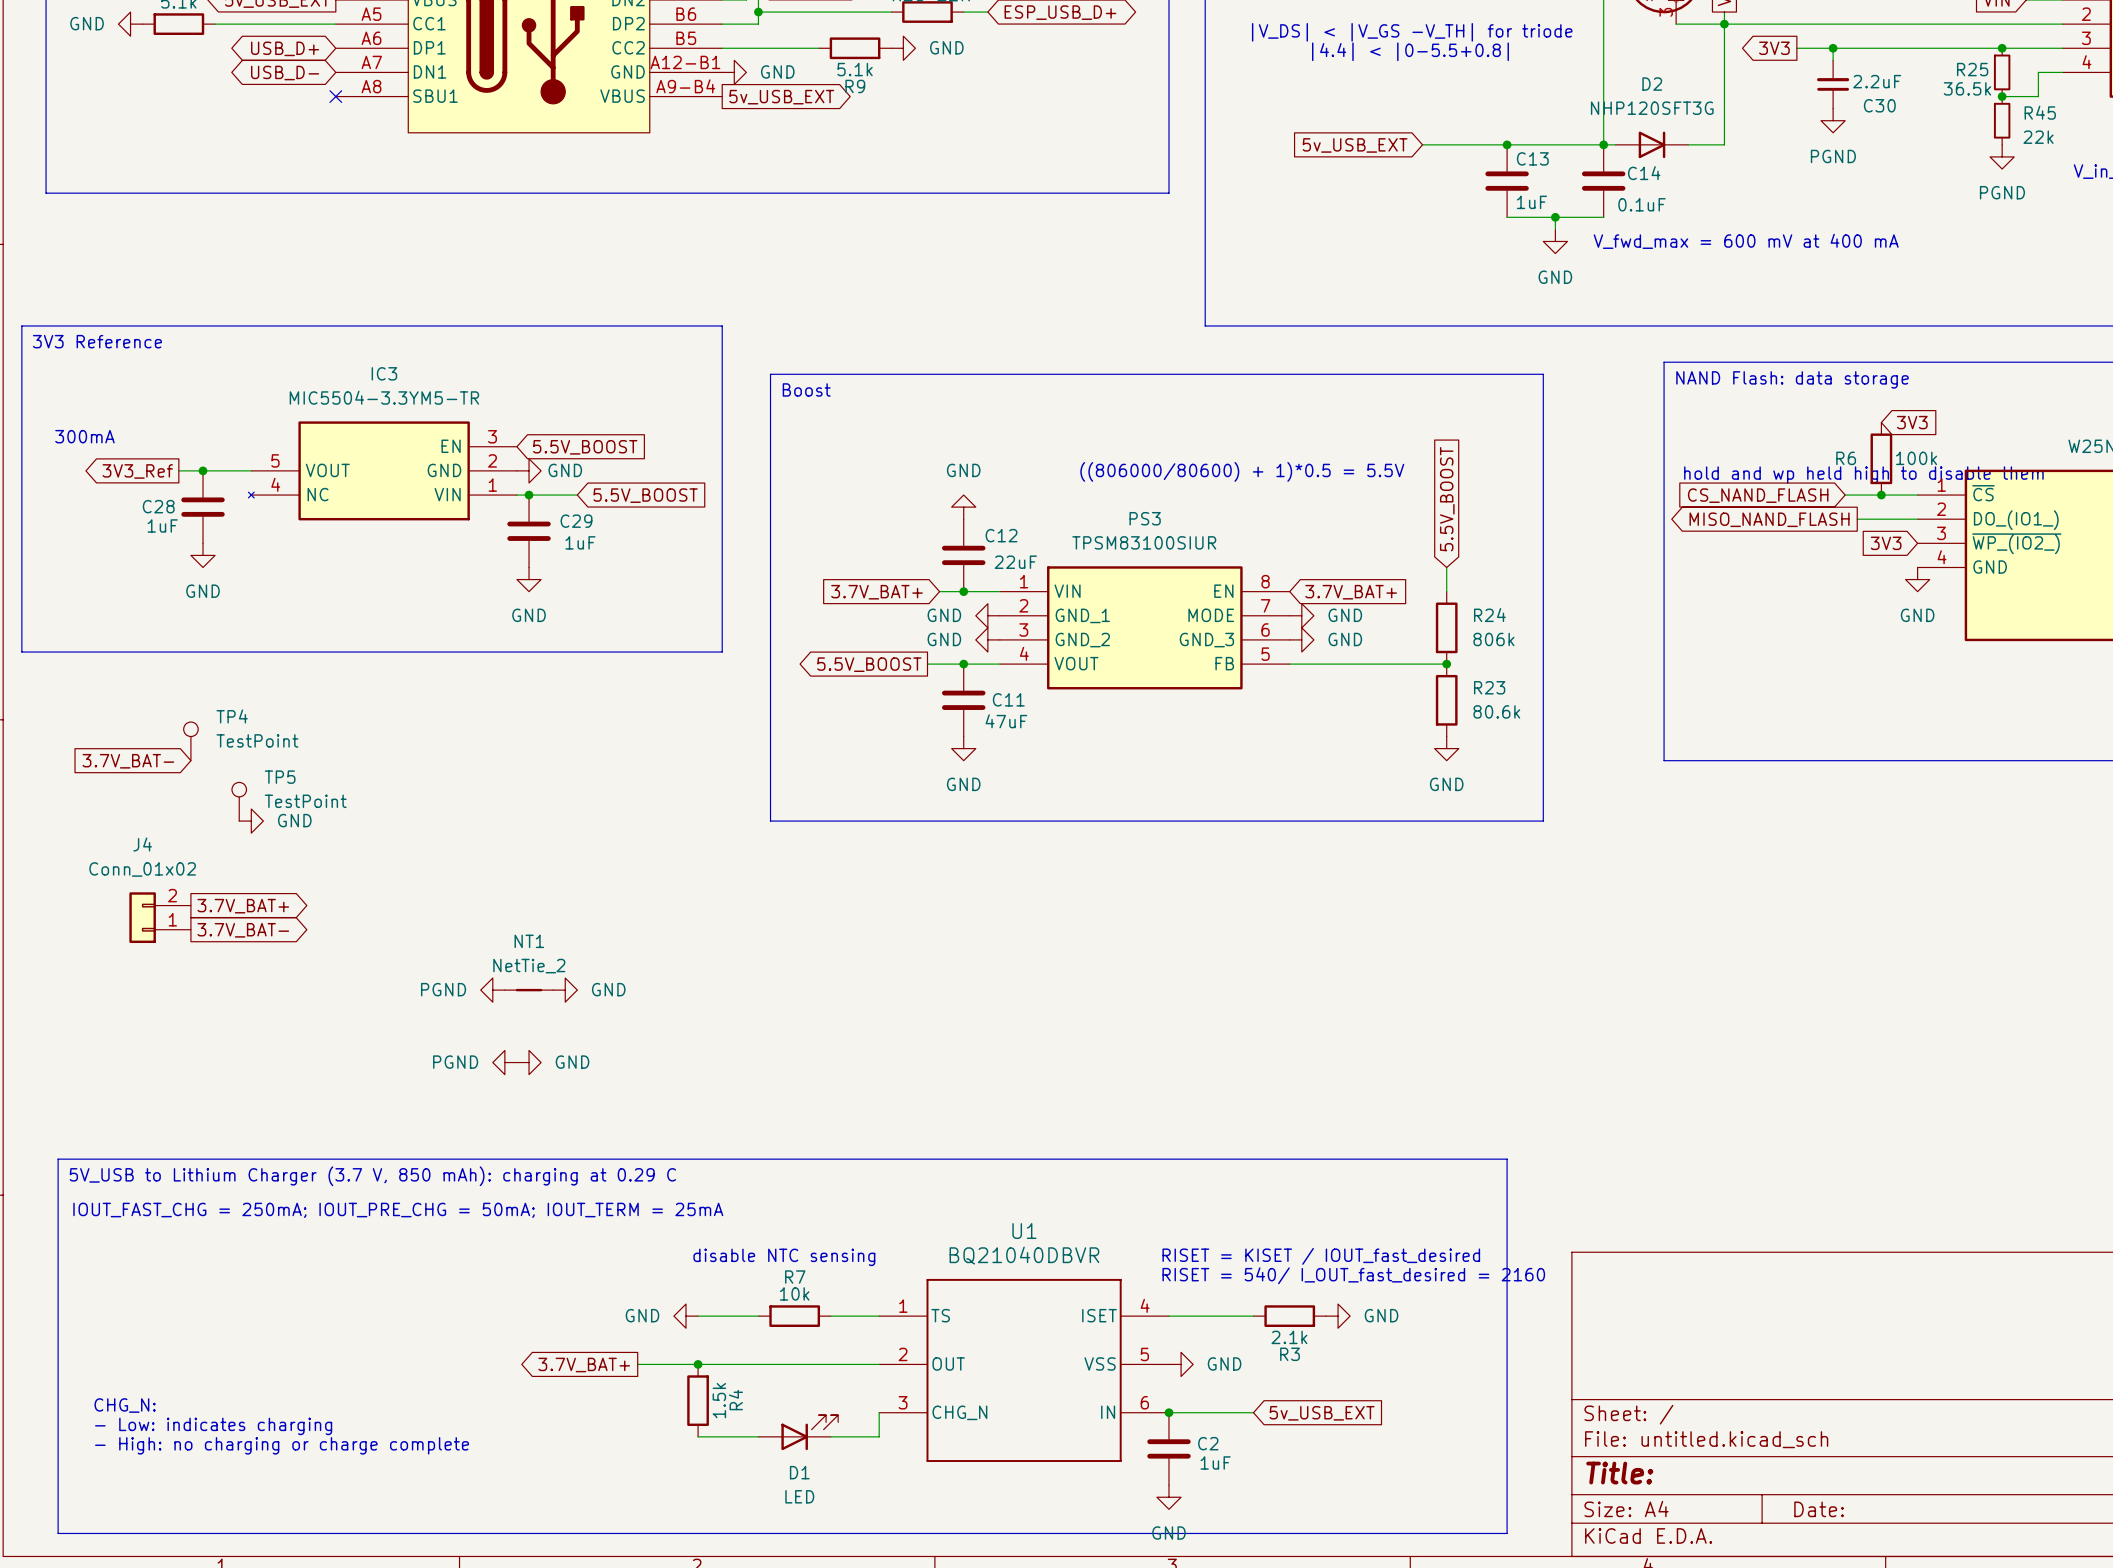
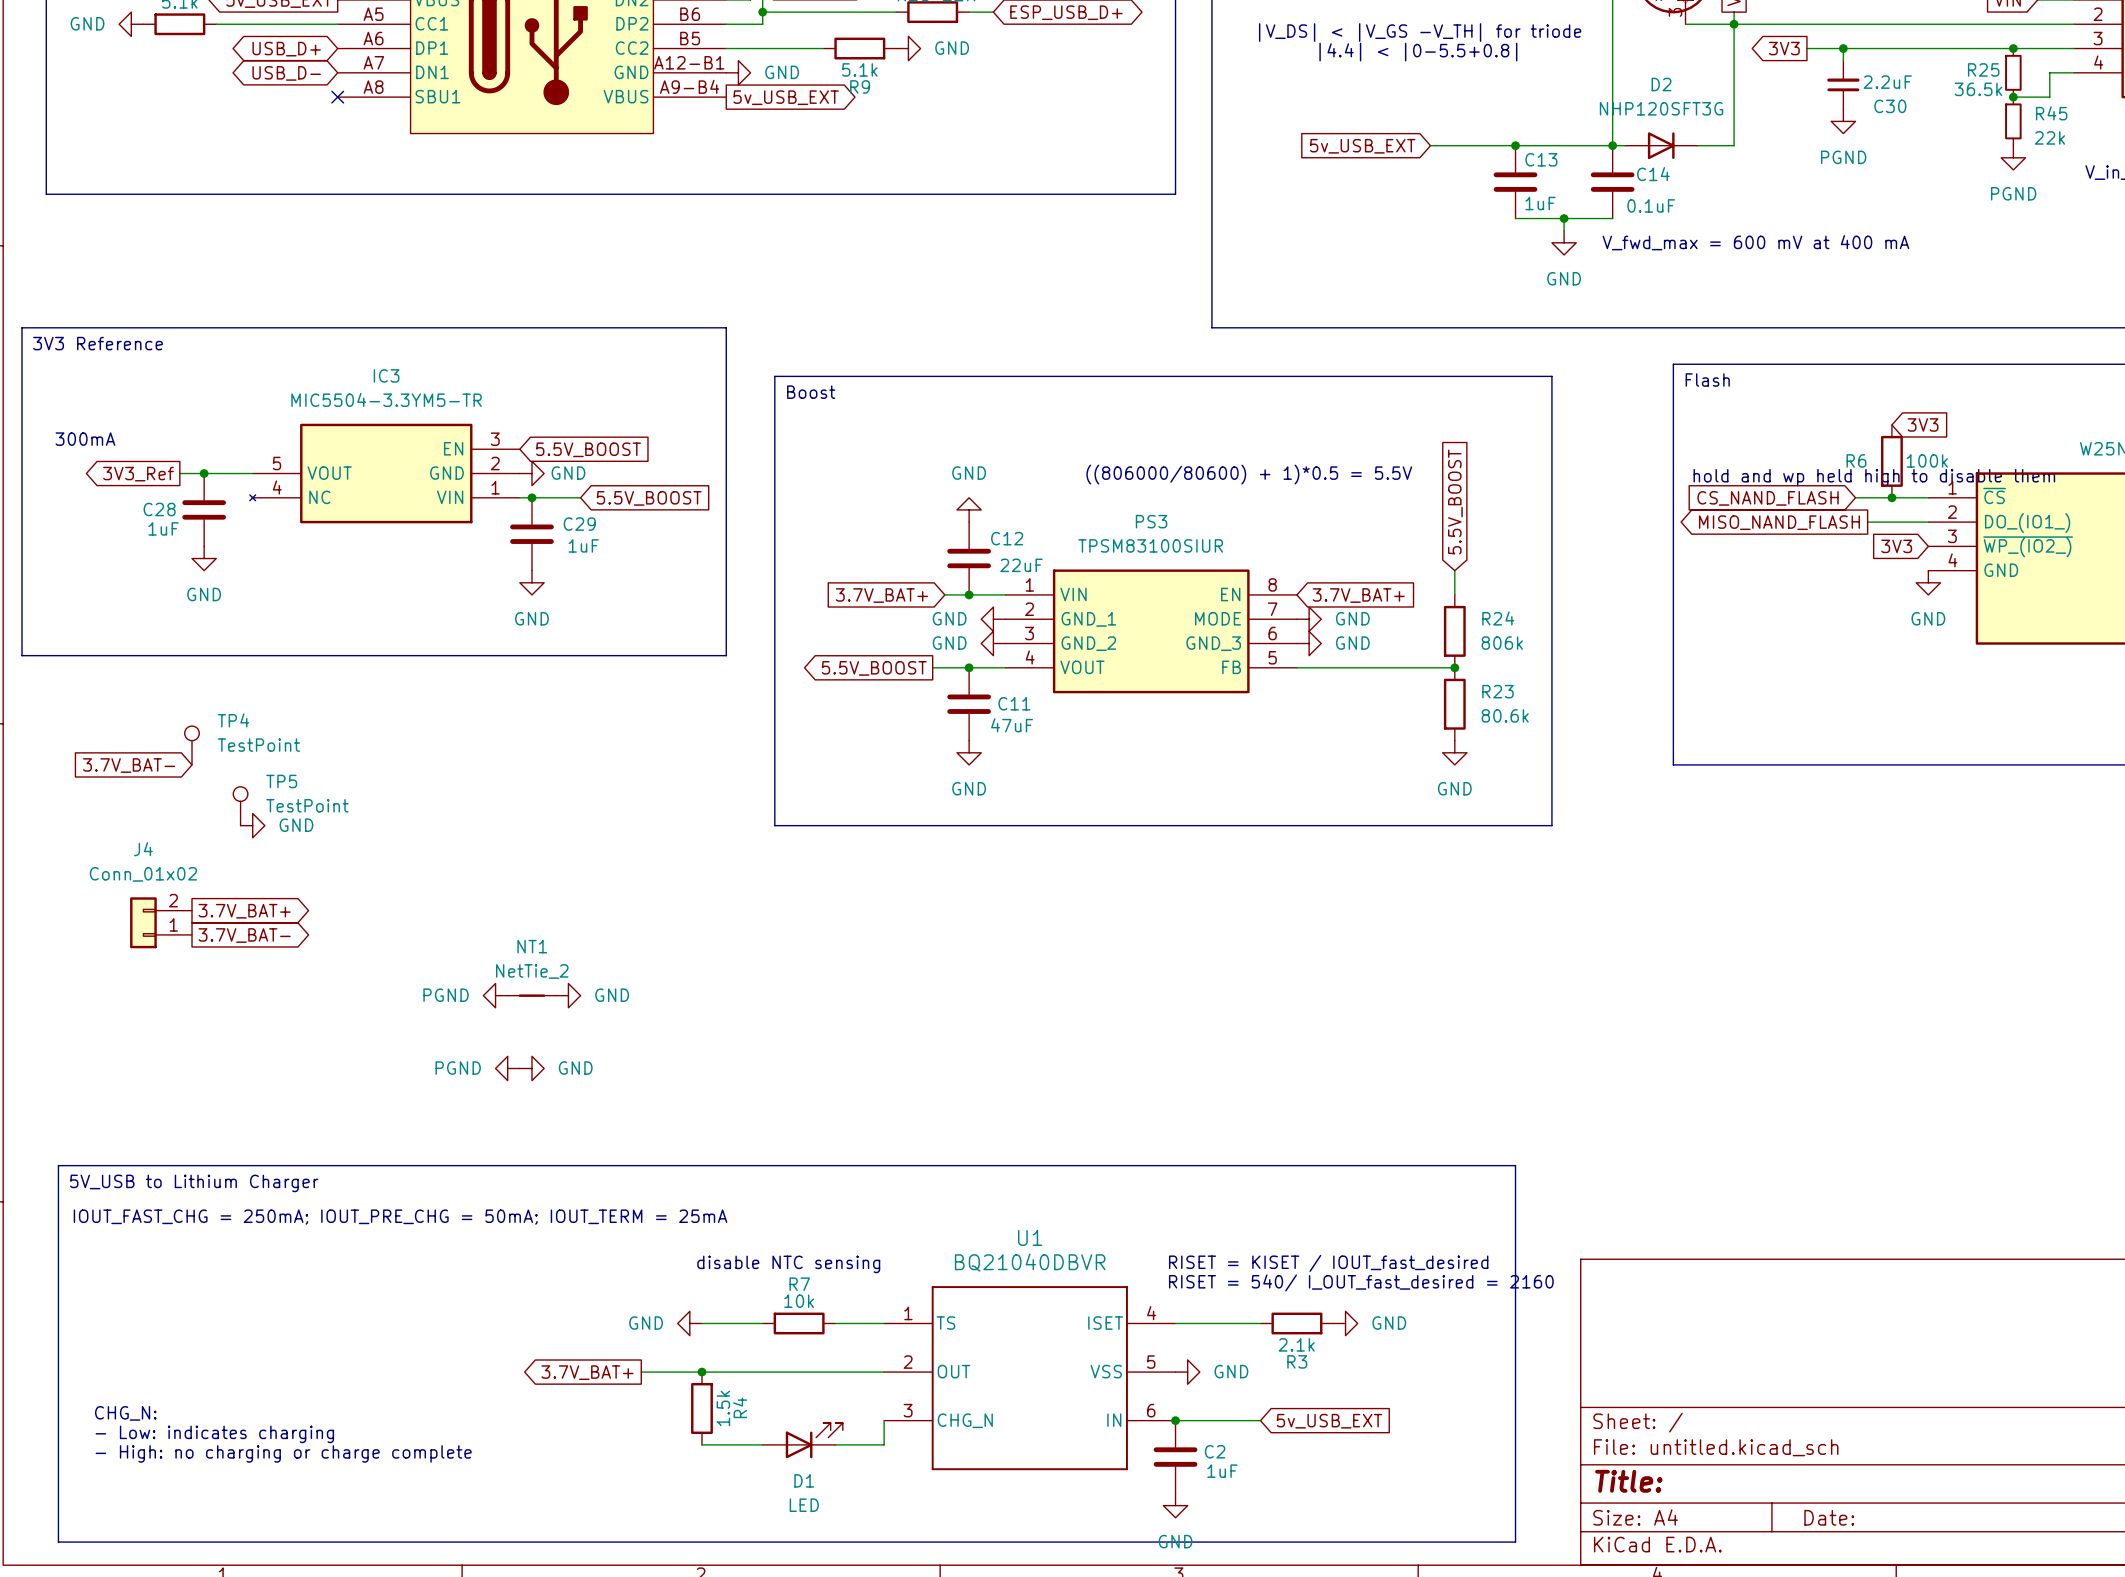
text: NAND Flash: data storage (1792, 379) -> Flash (1707, 380)
text: 5V_USB to Lithium Charger (3.7 V, 850 mAh): charging at 0.29 C (372, 1176) -> 5V_USB to Lithium Charger (194, 1183)

